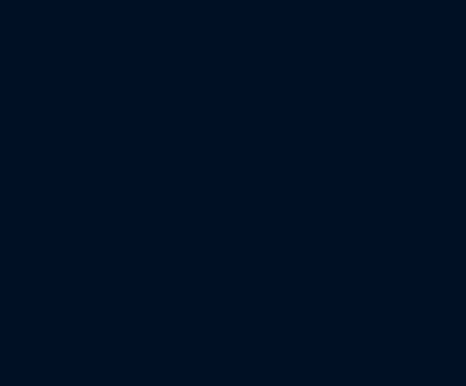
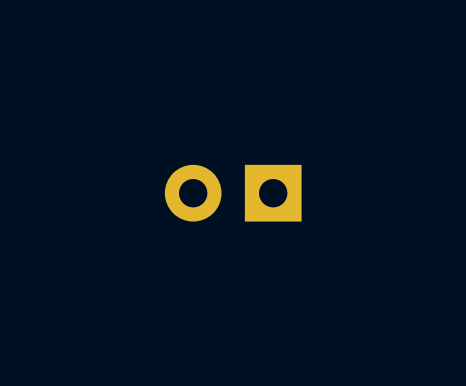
part: none -> (233, 193)

